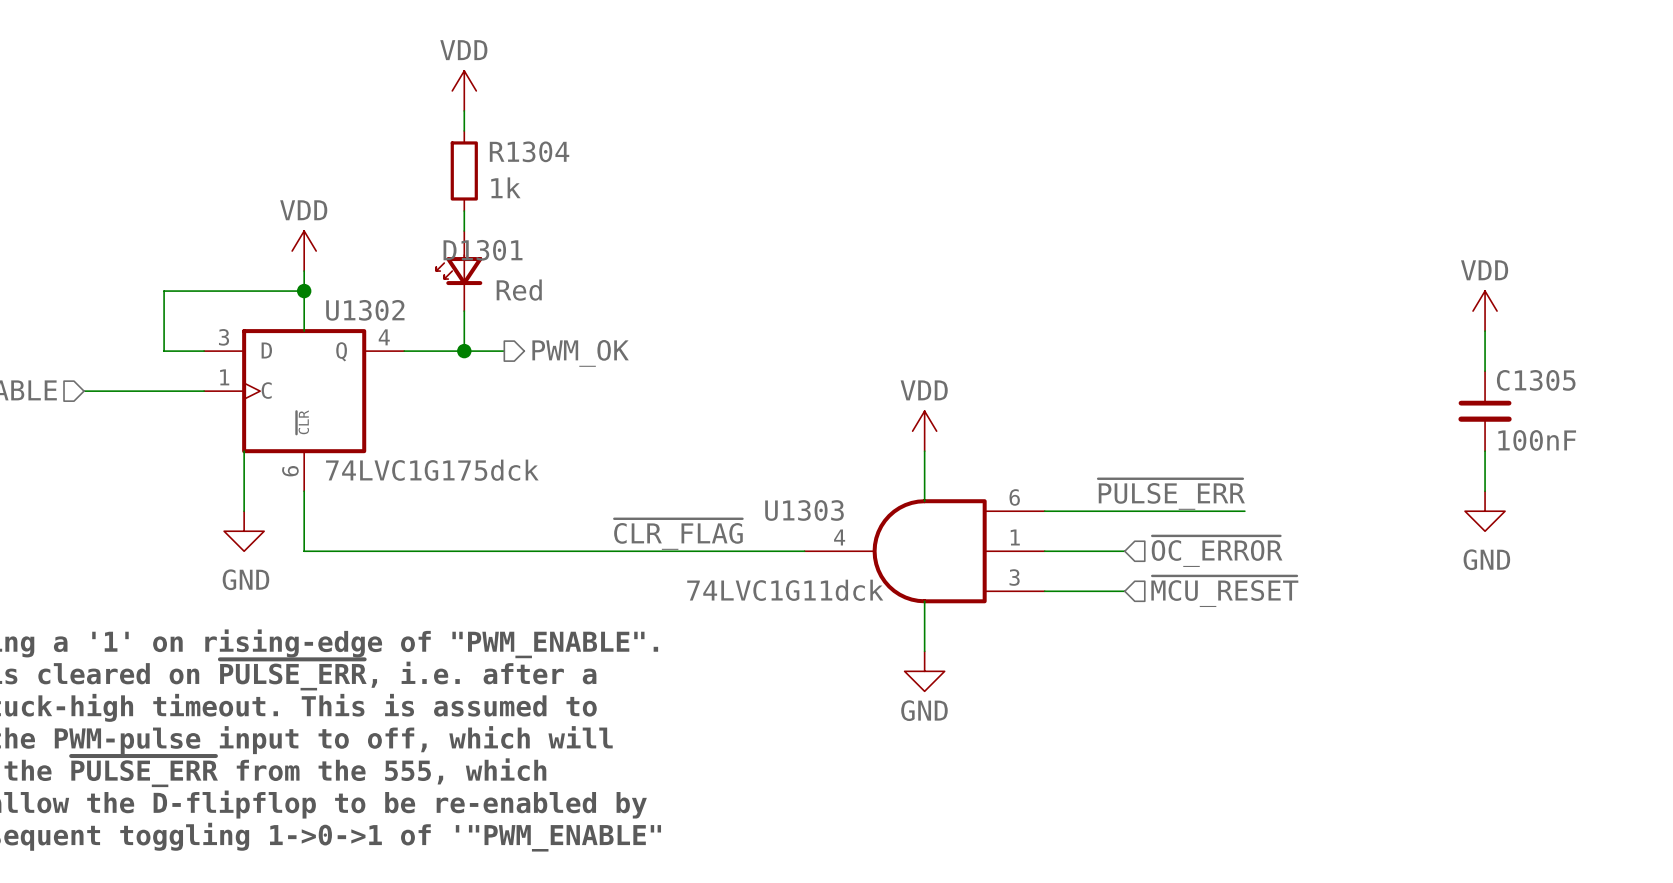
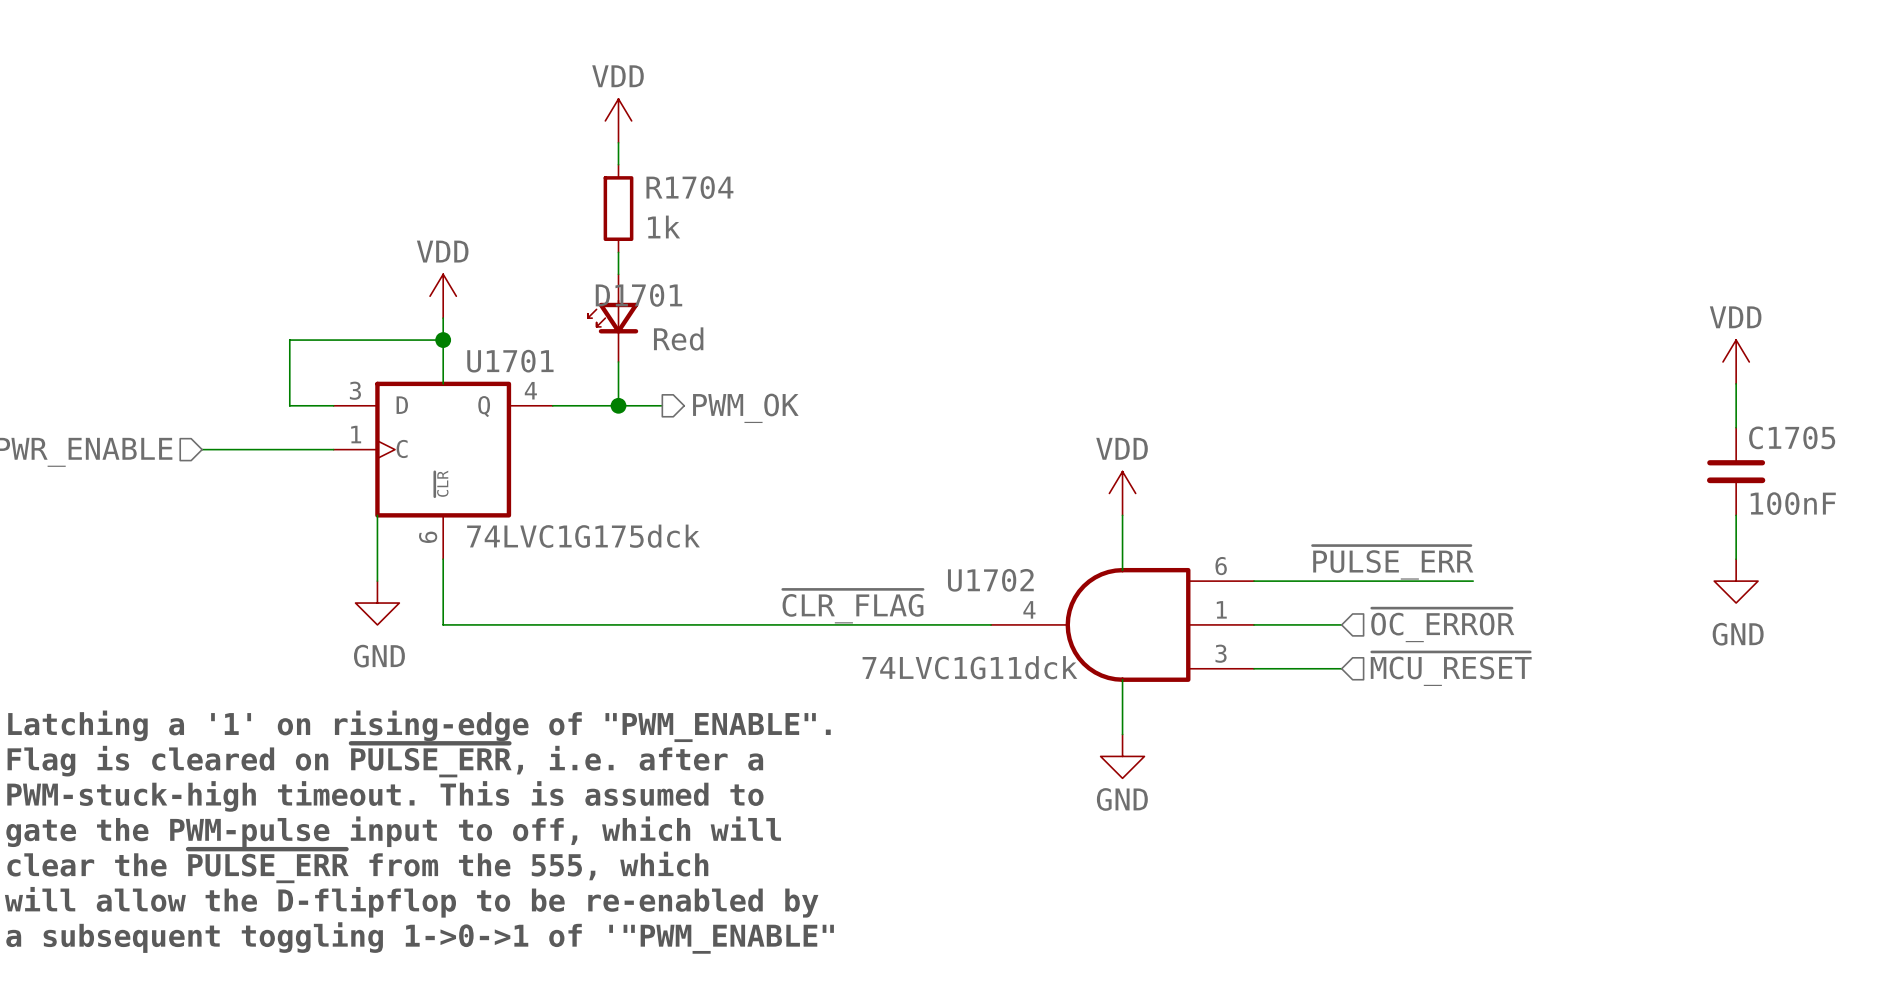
R1304 name: R1304 (529, 151) -> R1704 (689, 187)
D1301 name: D1301 (483, 250) -> D1701 (638, 295)
U1302 name: U1302 (365, 310) -> U1701 (510, 361)
C1305 name: C1305 (1536, 380) -> C1705 (1792, 437)
U1303 name: U1303 (804, 510) -> U1702 (990, 580)

